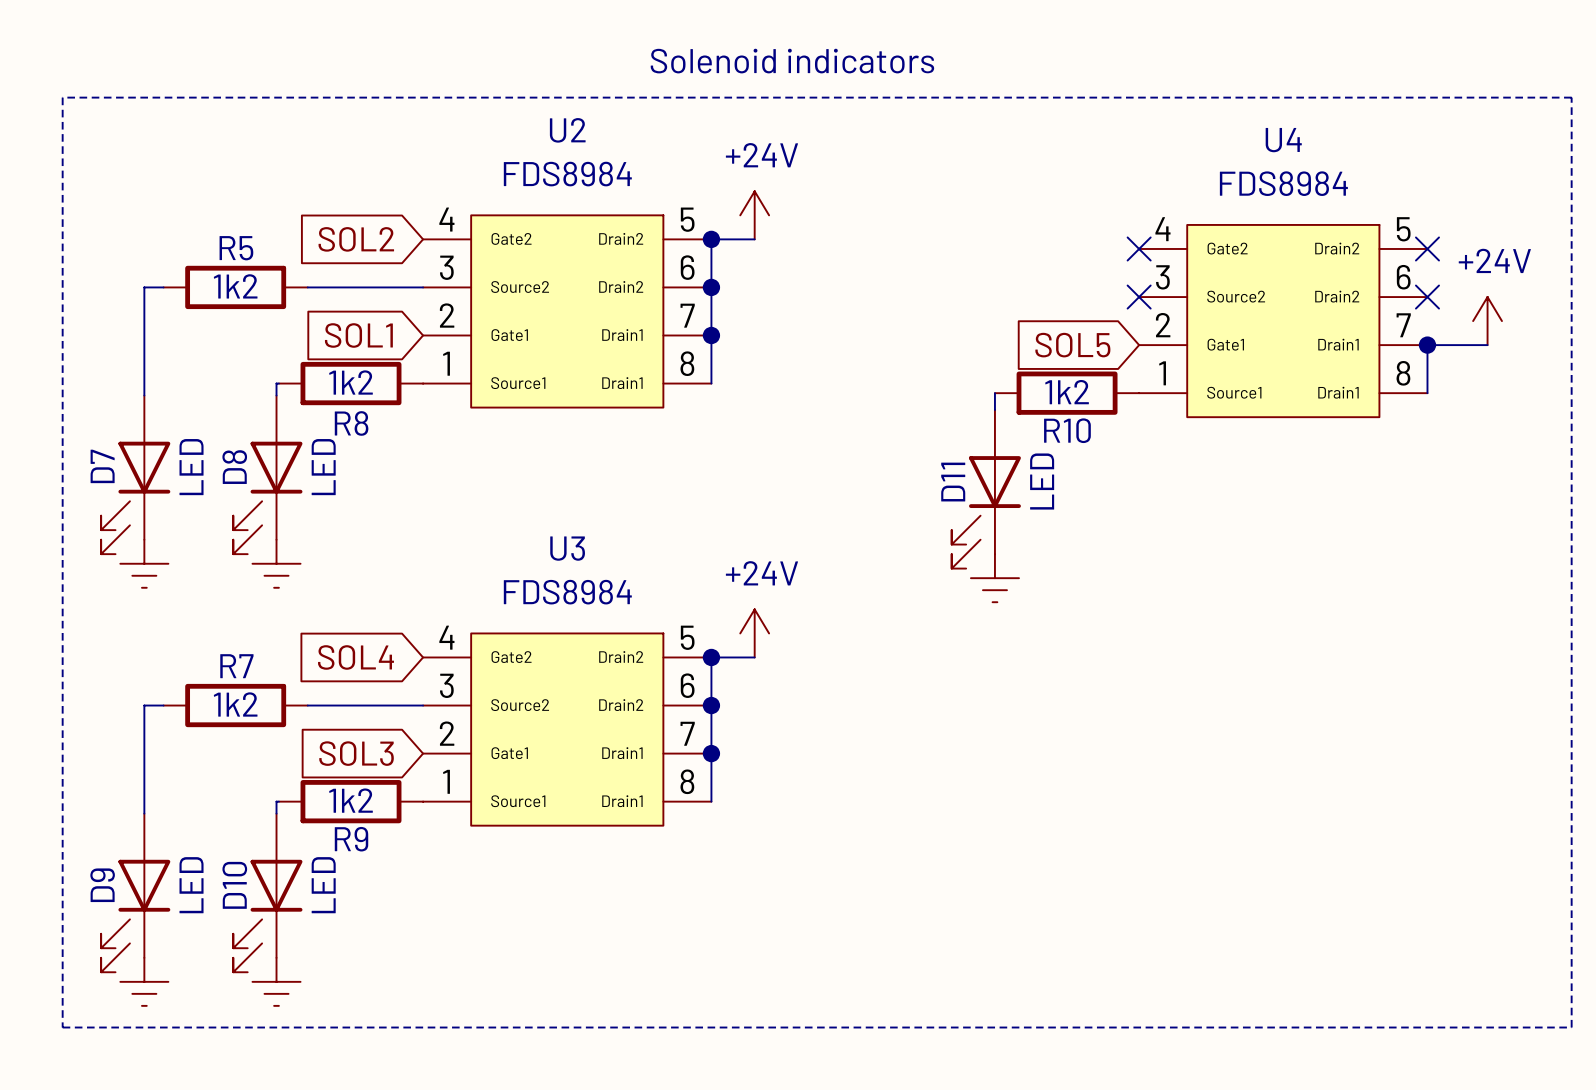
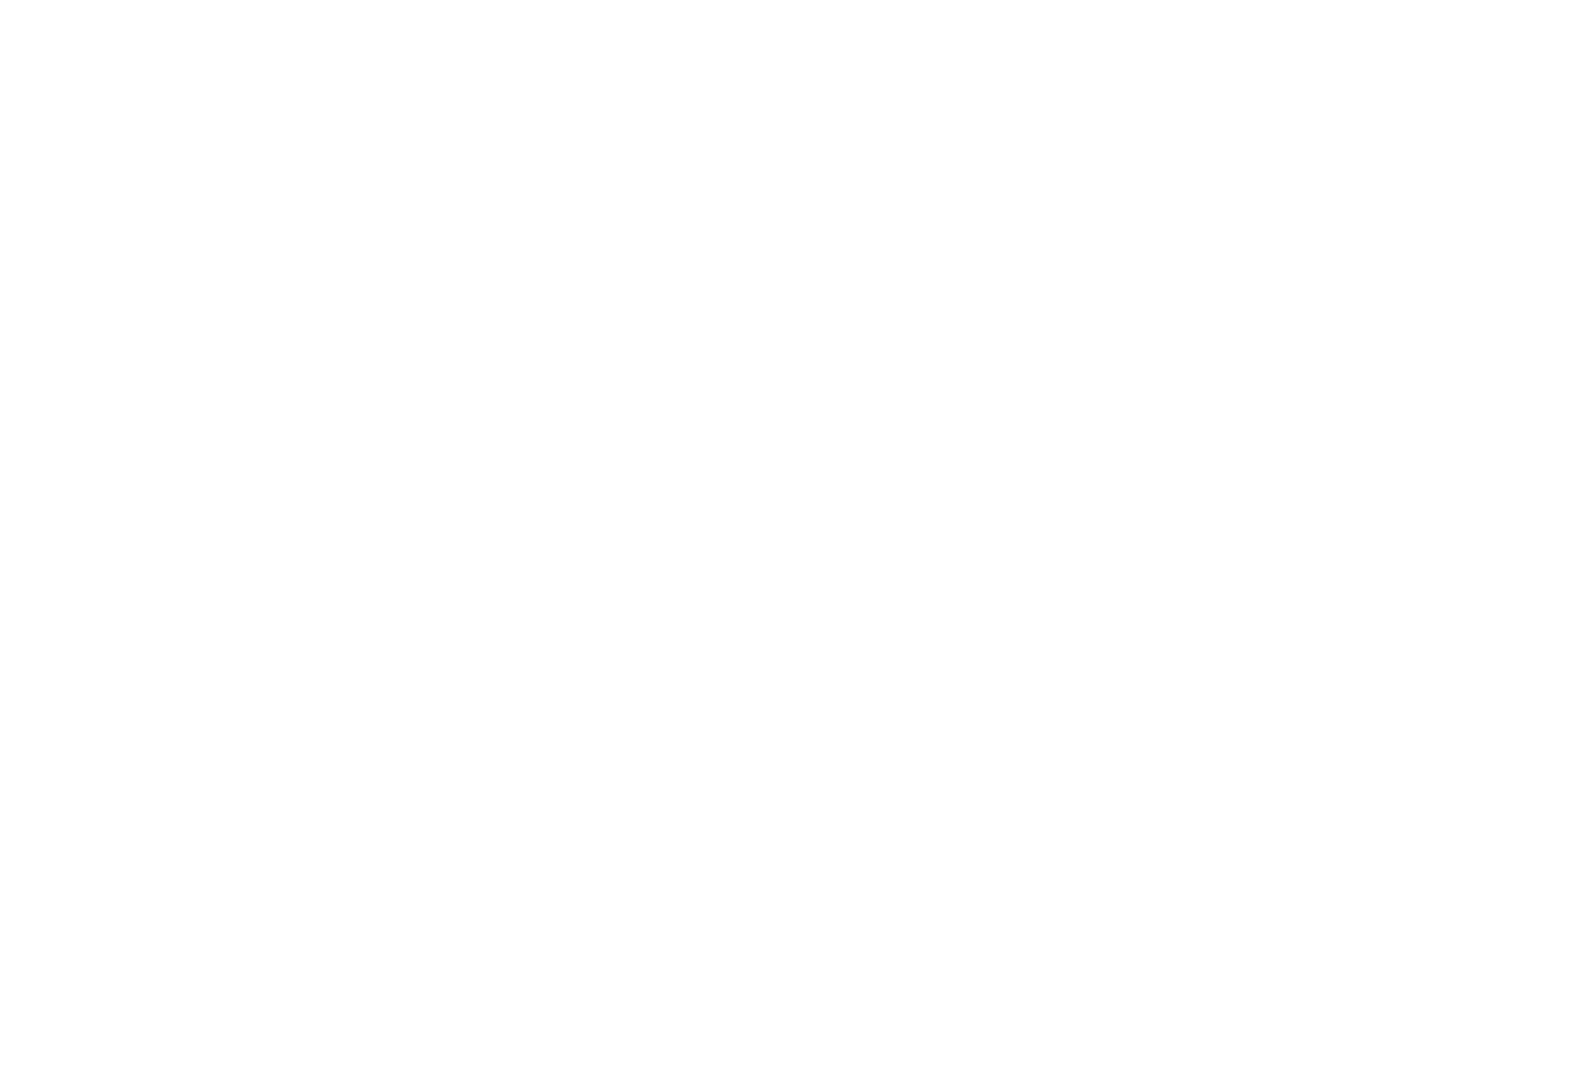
text: Solenoid indicators (792, 61) -> none
line: (62, 97) (62, 1027) (1571, 1027) (1571, 97) (62, 97) -> none
power symbol: +24V (754, 215) -> none
global label: SOL2 (356, 239) -> none
junction: (711, 239) -> none
wire: (754, 239) (711, 239) (711, 383) -> none
no-connect mark: (1139, 248) -> none
no-connect mark: (1427, 248) -> none
wire: (163, 287) (144, 287) (144, 395) -> none
R5: 1k2 (235, 287) -> none
wire: (307, 287) (423, 287) -> none
junction: (711, 287) -> none
no-connect mark: (1139, 297) -> none
no-connect mark: (1427, 297) -> none
U2: FDS8984 (567, 311) -> none
U4: FDS8984 (1283, 321) -> none
power symbol: +24V (1487, 321) -> none
global label: SOL1 (358, 335) -> none
junction: (711, 335) -> none
global label: SOL5 (1072, 345) -> none
junction: (1427, 345) -> none
wire: (1487, 345) (1427, 345) (1427, 393) -> none
wire: (278, 383) (276, 383) (276, 395) -> none
R8: 1k2 (351, 383) -> none
wire: (994, 393) (994, 409) -> none
R10: 1k2 (1067, 393) -> none
D7: LED (135, 474) -> none
D8: LED (267, 474) -> none
D11: LED (986, 489) -> none
power symbol: (144, 563) -> none
power symbol: (276, 563) -> none
power symbol: (994, 578) -> none
power symbol: +24V (754, 633) -> none
global label: SOL4 (356, 657) -> none
junction: (711, 657) -> none
wire: (754, 657) (711, 657) (711, 801) -> none
wire: (163, 705) (144, 705) (144, 813) -> none
R7: 1k2 (235, 705) -> none
wire: (307, 705) (423, 705) -> none
junction: (711, 705) -> none
U3: FDS8984 (567, 729) -> none
global label: SOL3 (356, 753) -> none
junction: (711, 753) -> none
wire: (278, 801) (276, 801) (276, 813) -> none
R9: 1k2 (351, 801) -> none
D9: LED (135, 892) -> none
D10: LED (267, 892) -> none
power symbol: (144, 981) -> none
power symbol: (276, 981) -> none

